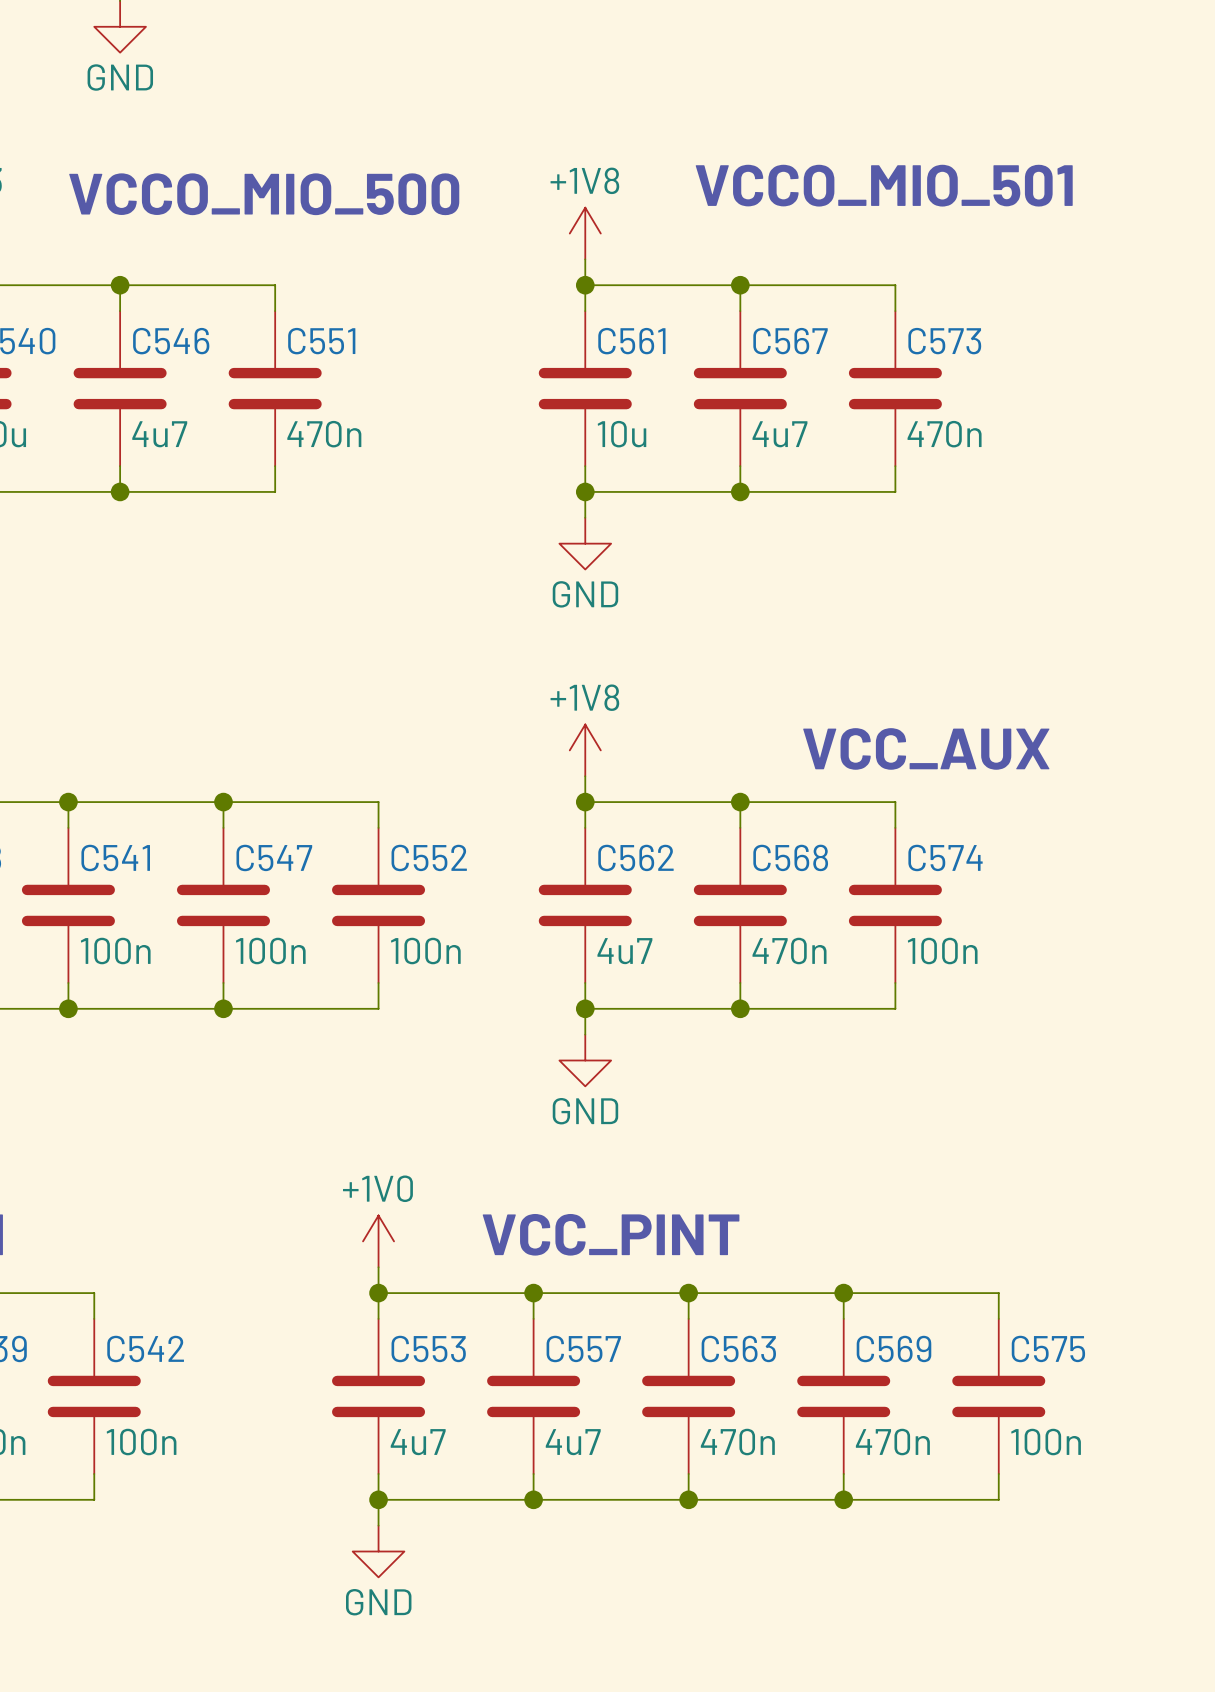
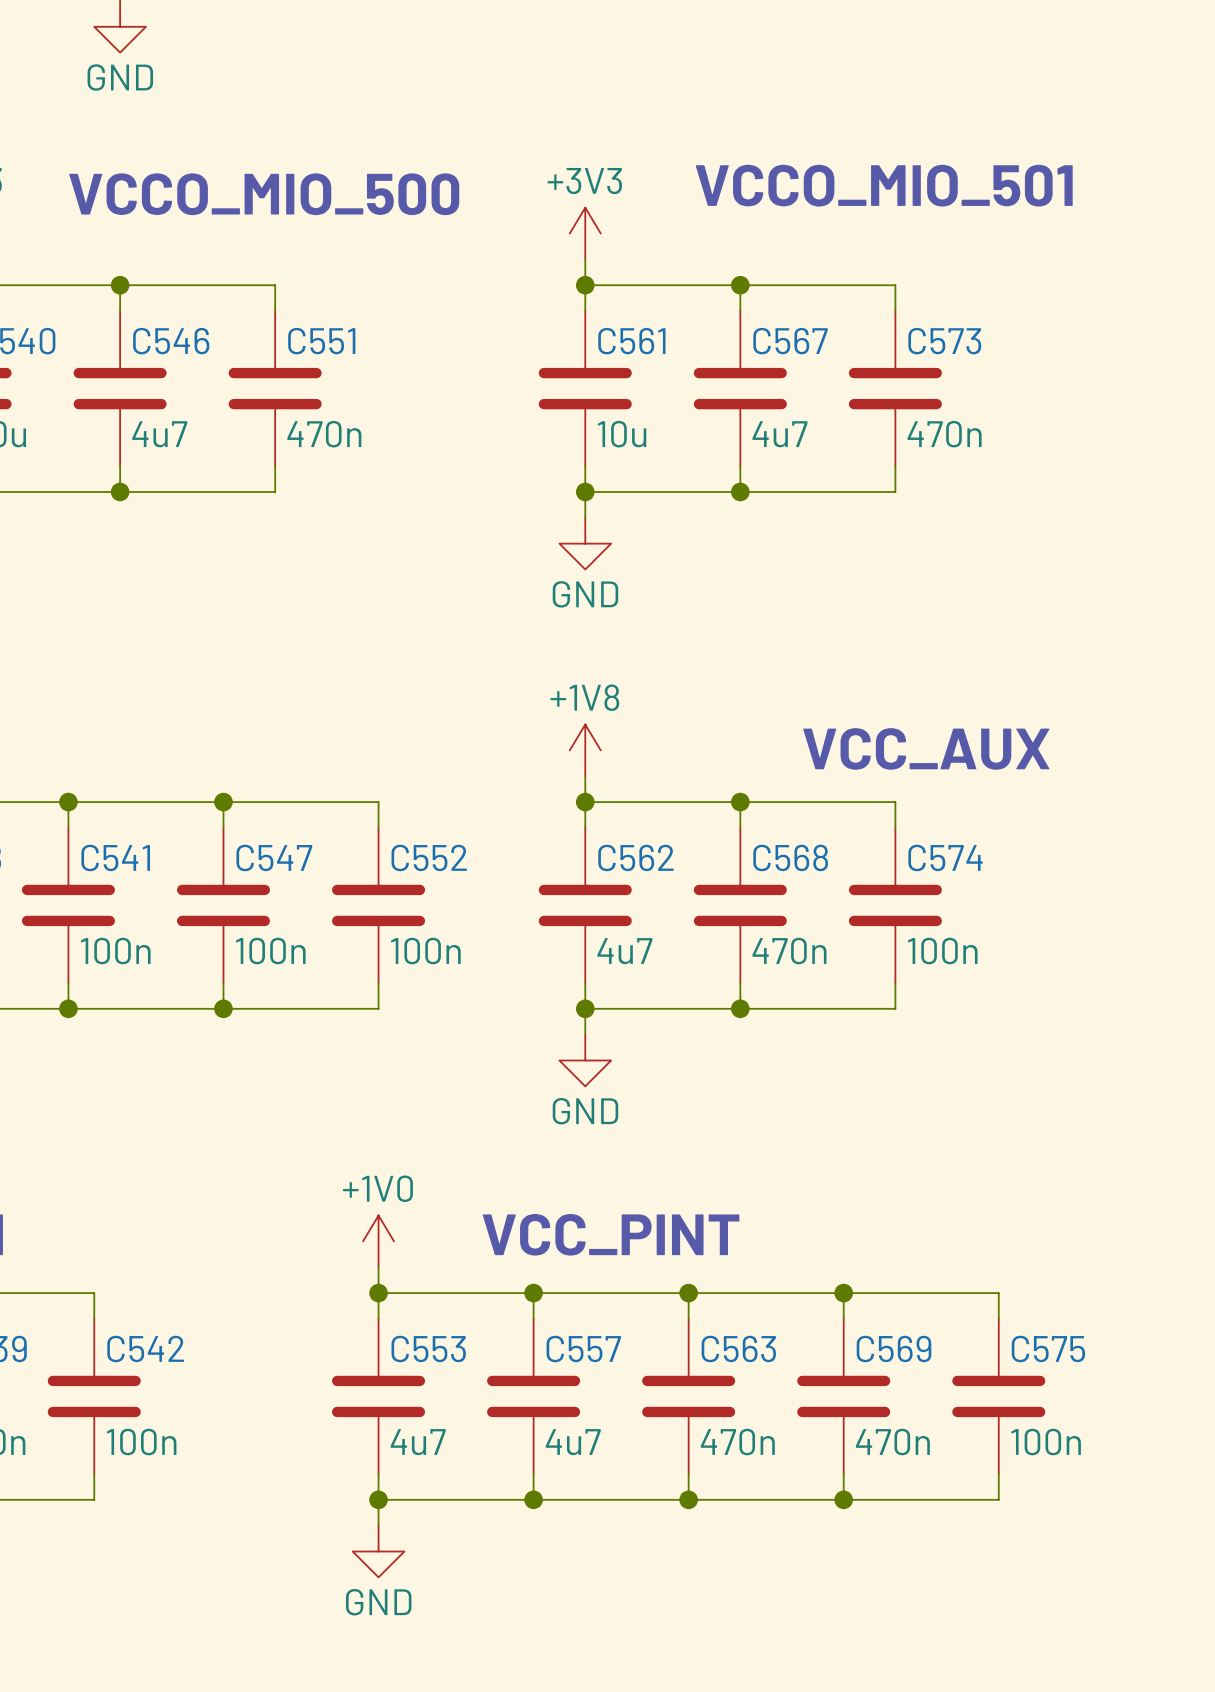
power symbol: +1V8 (585, 233) -> +3V3 (585, 233)

